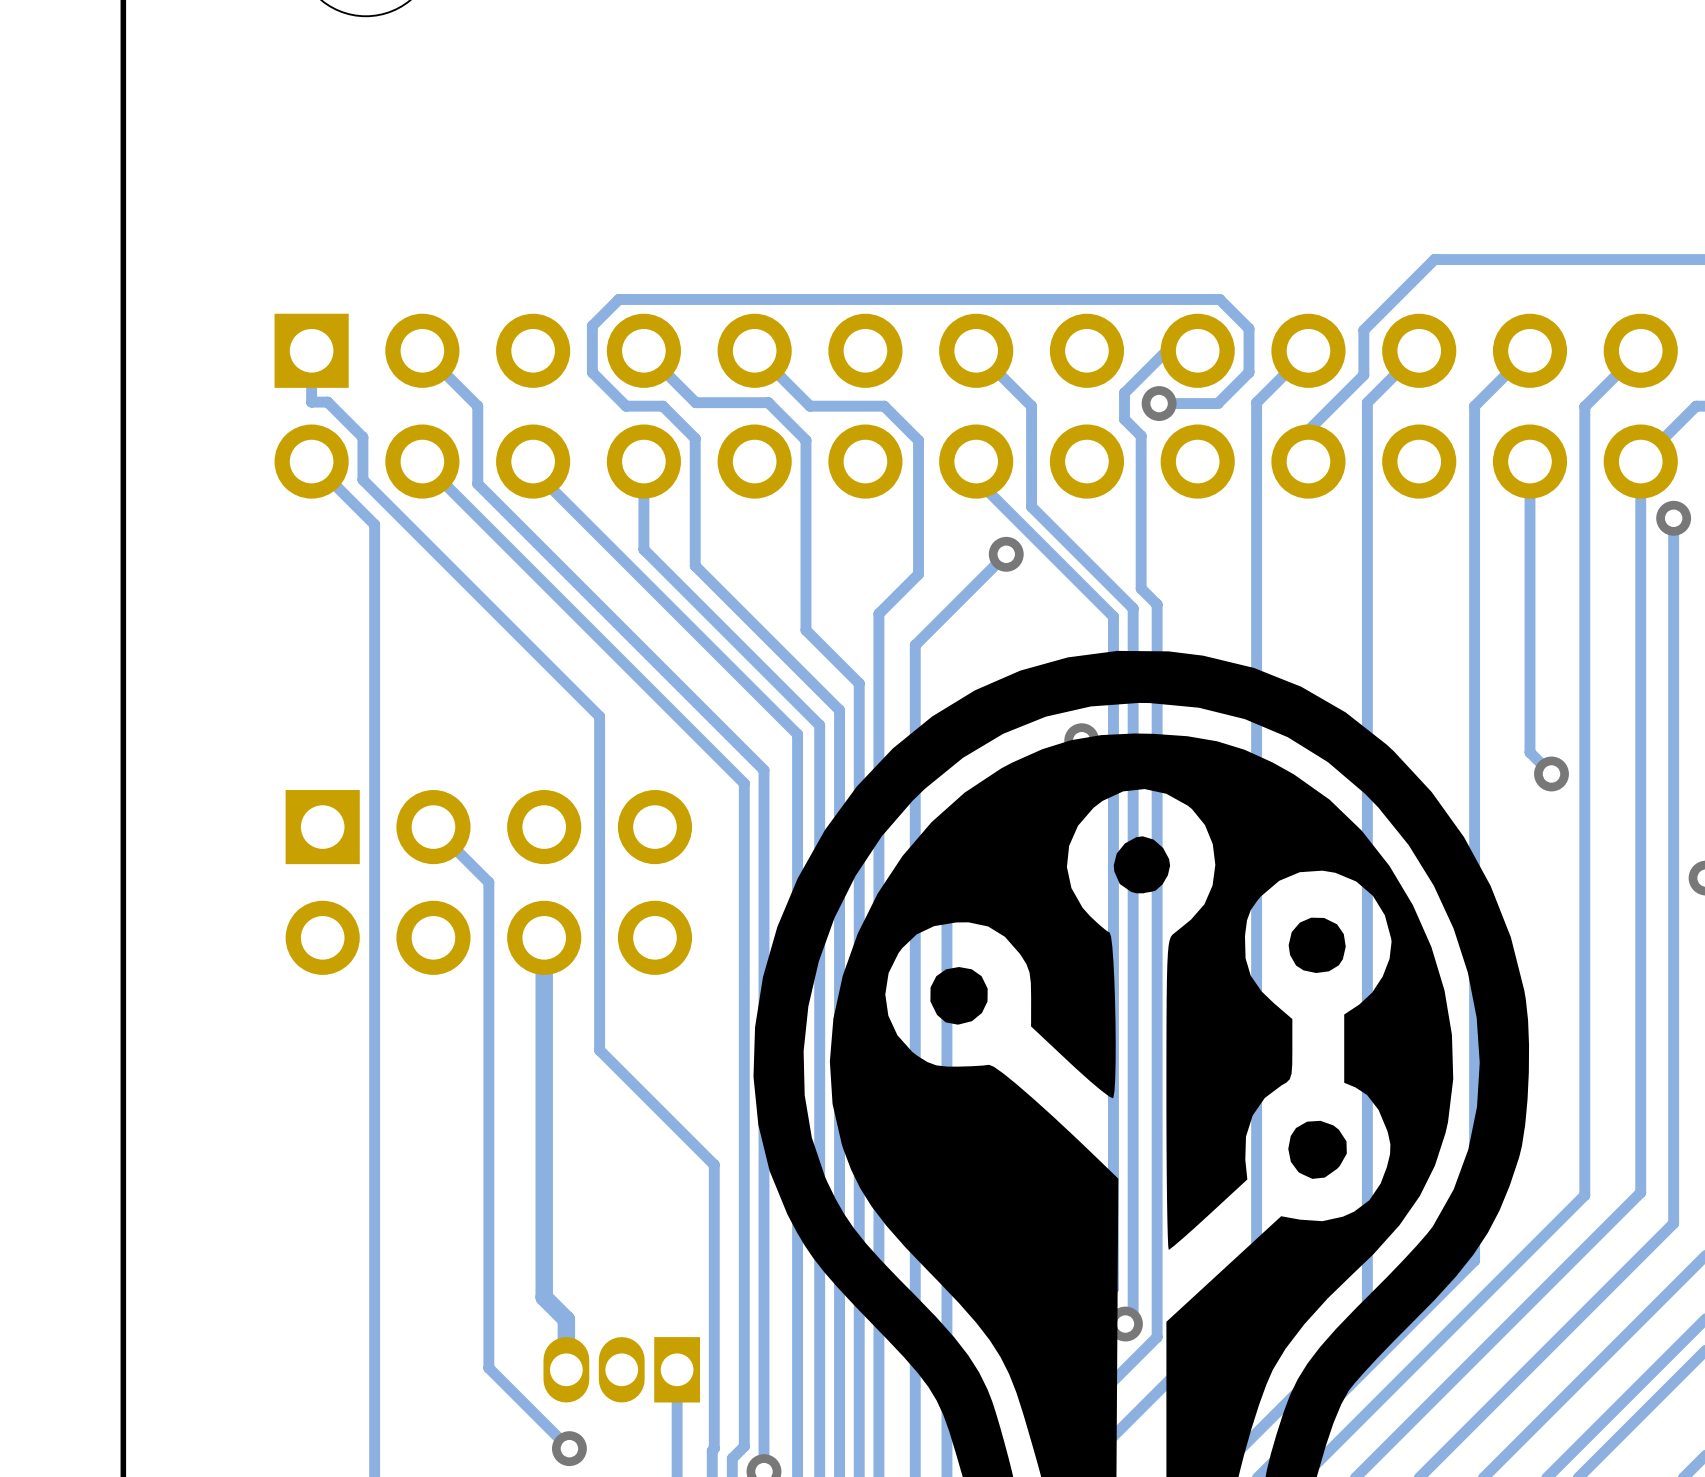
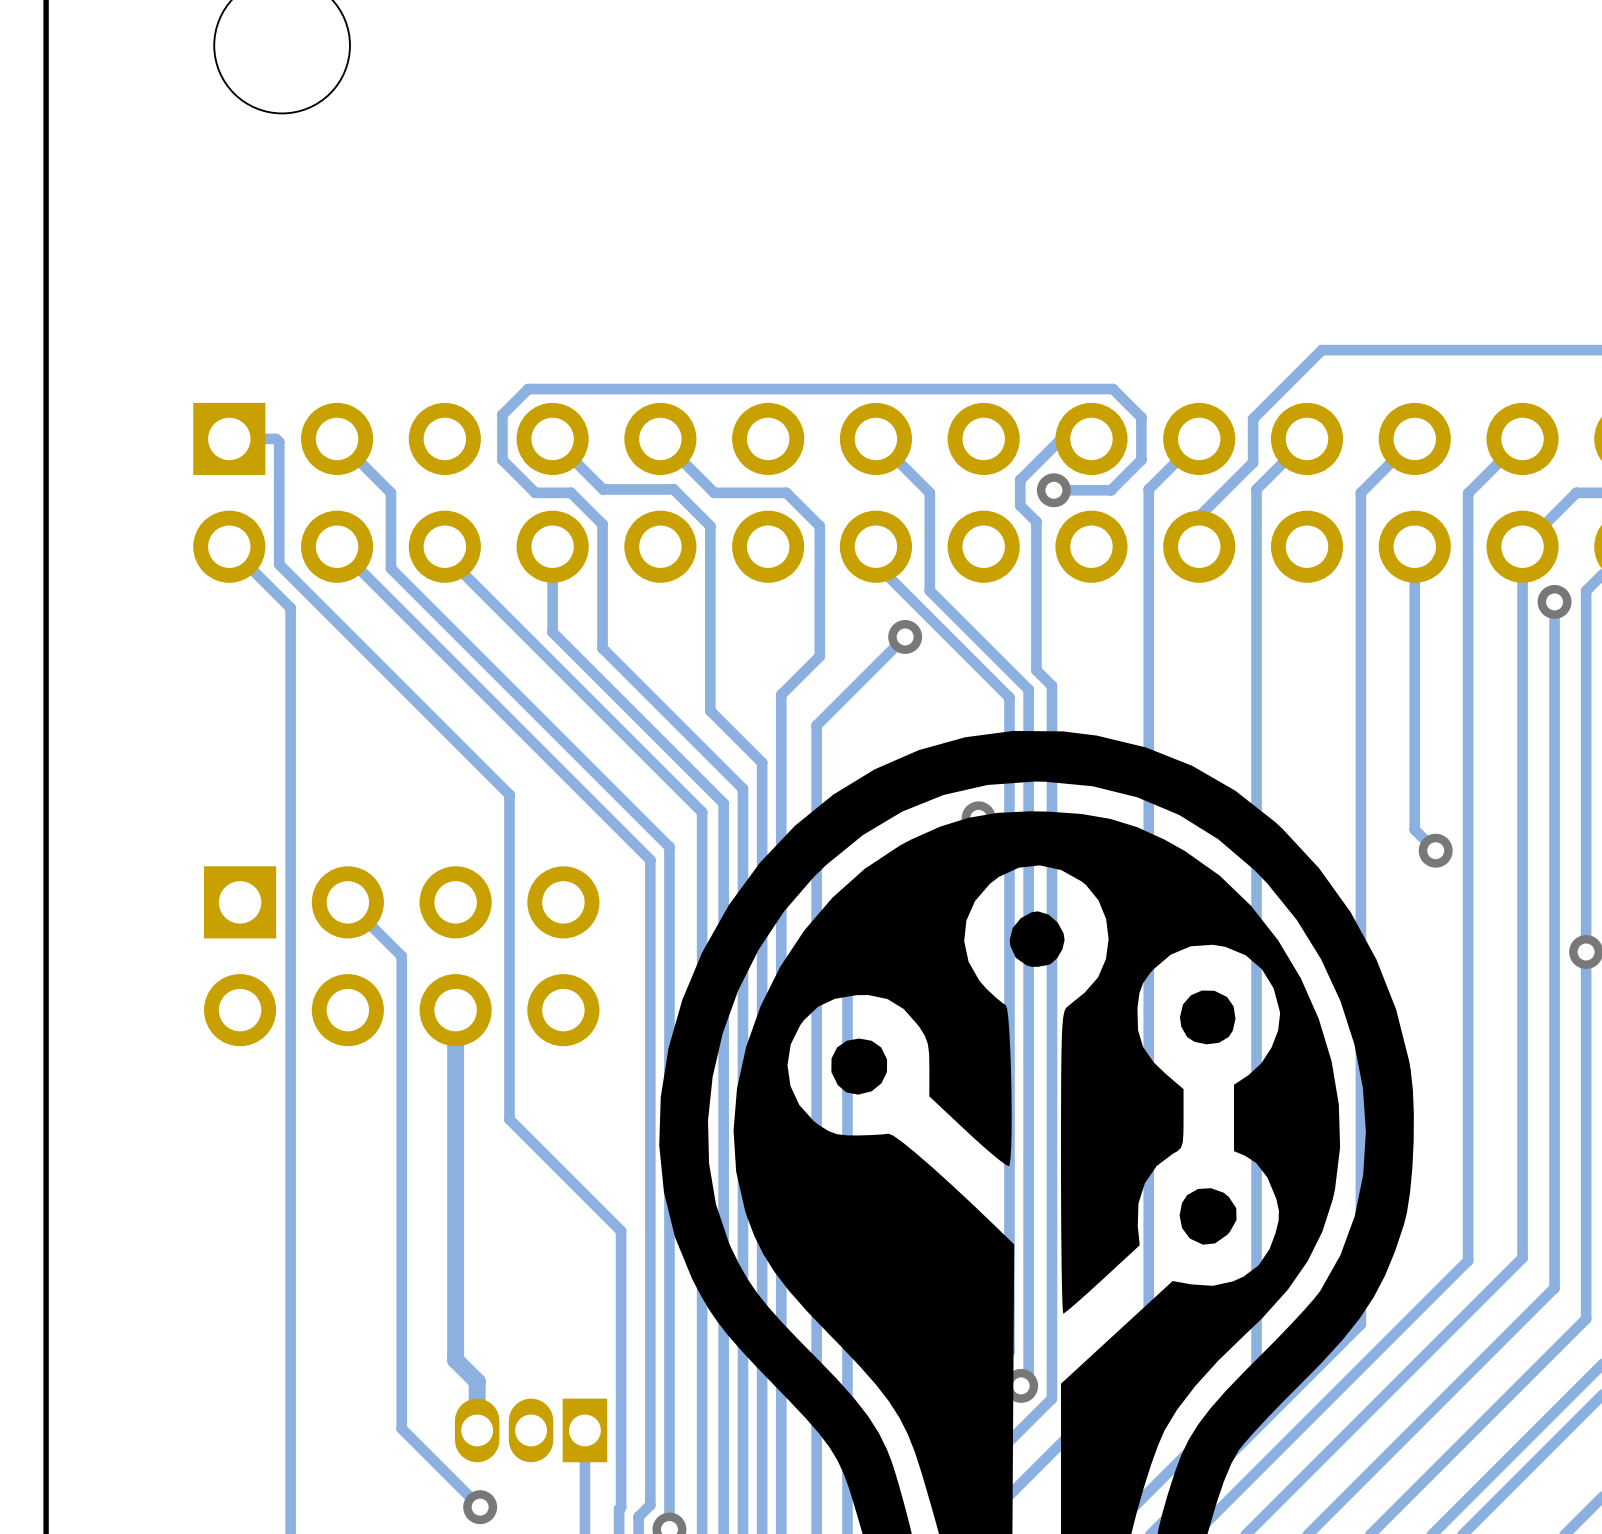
track: (311, 350) (311, 402) (327, 402) (362, 437) -> (229, 438) (275, 438) (279, 442) (279, 523)

